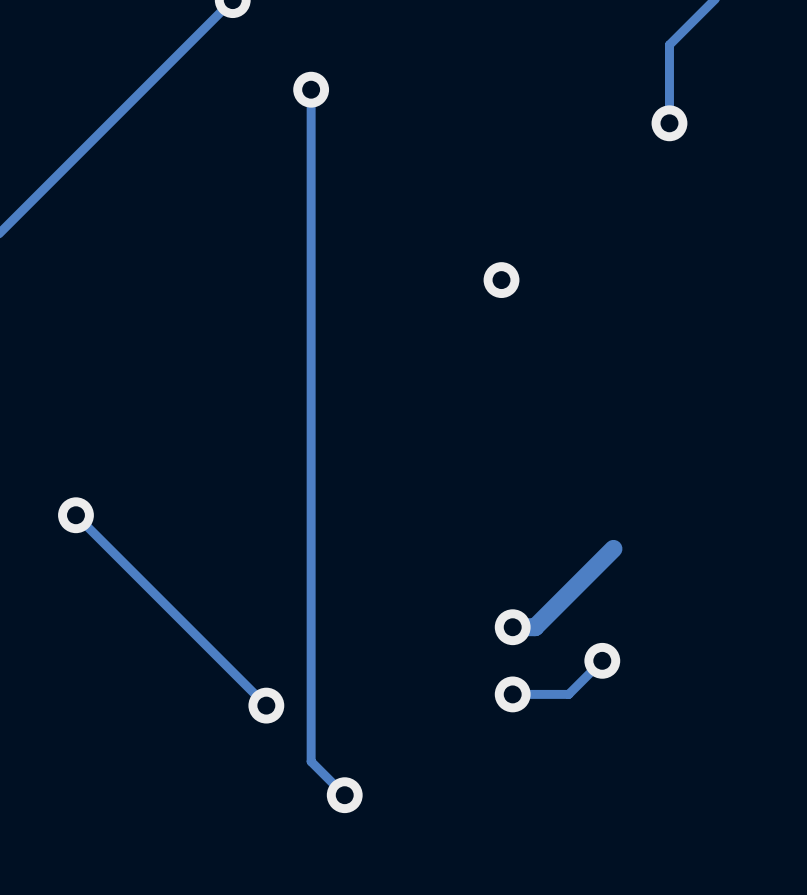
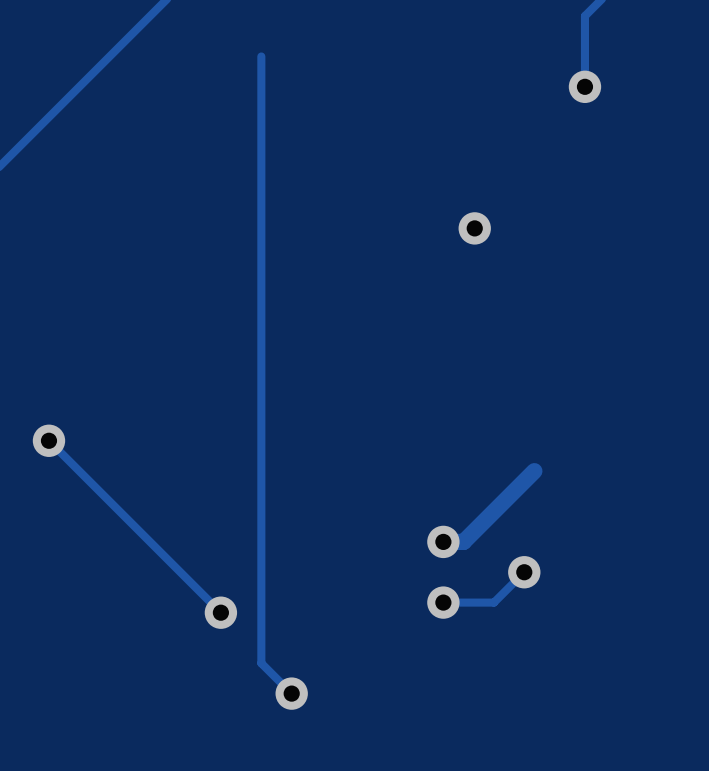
via: (311, 89) -> none
via position: (501, 280) -> (474, 228)

